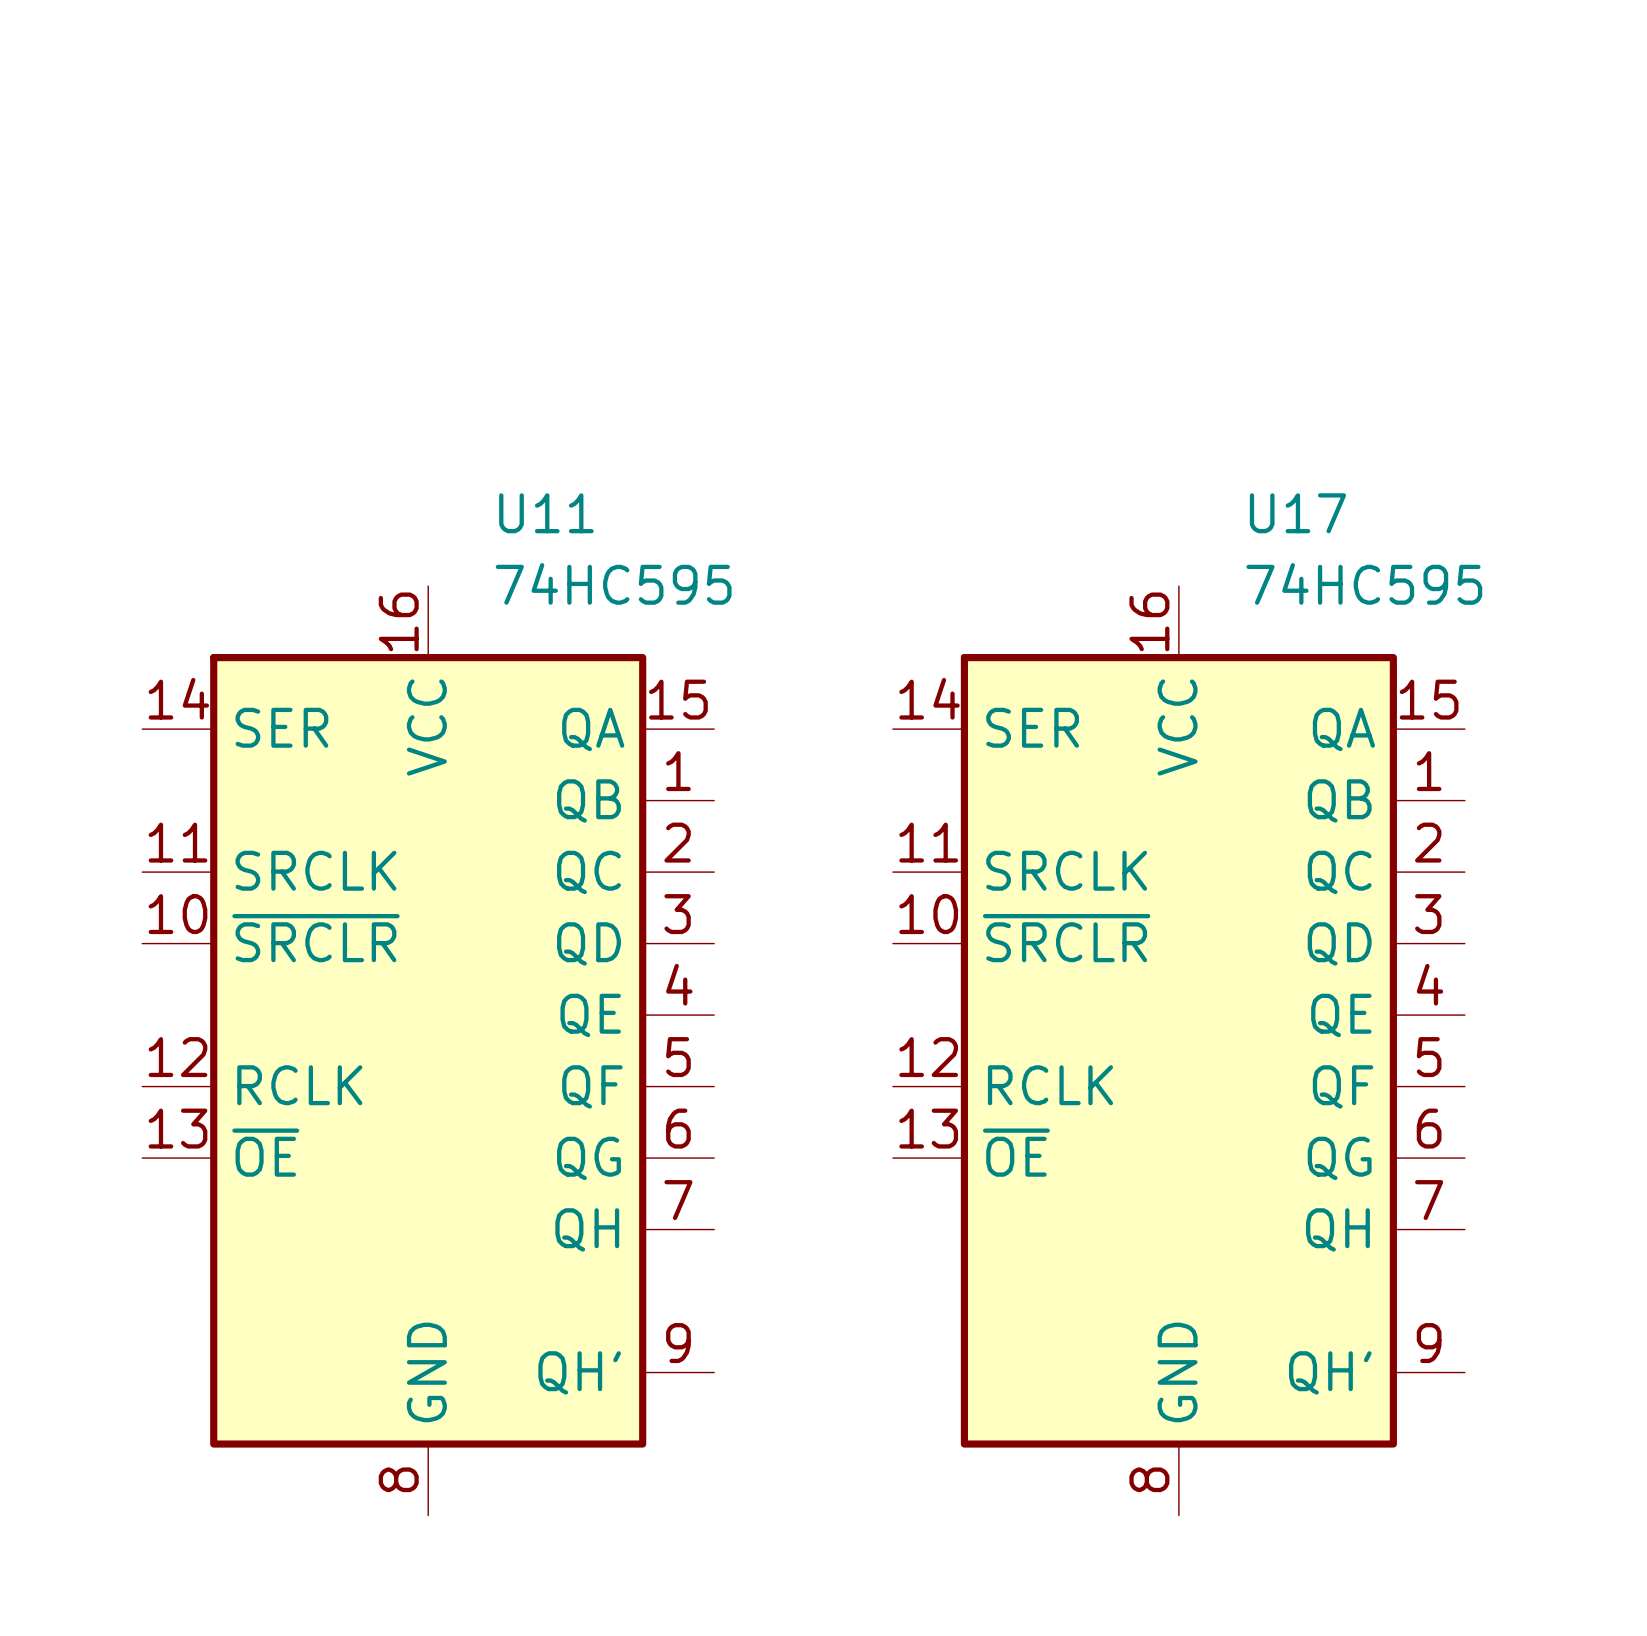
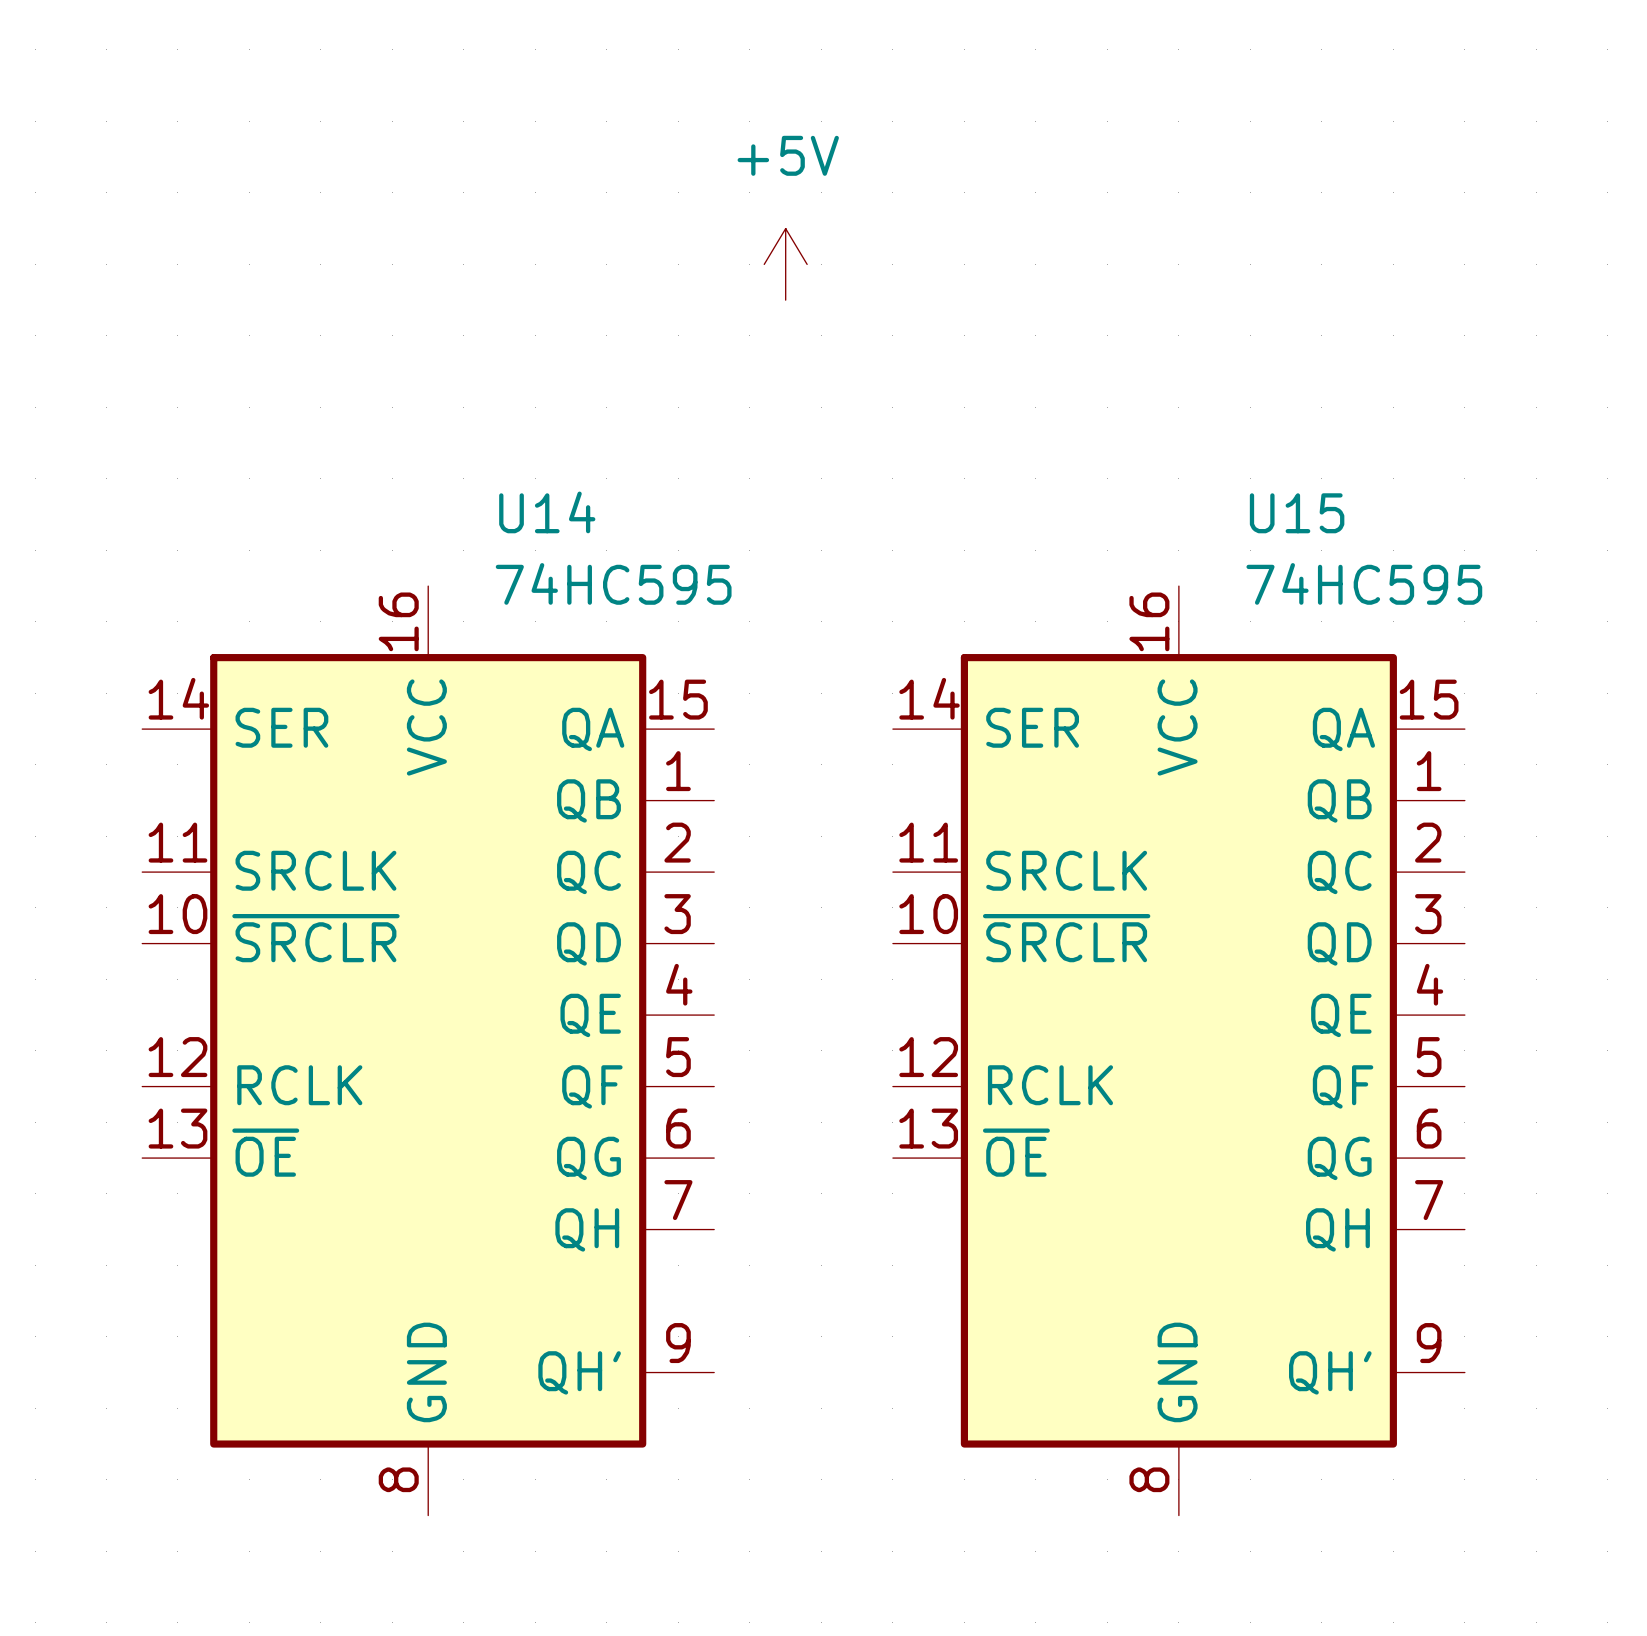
power symbol: none -> +5V (785, 264)
U11 name: U11 (546, 513) -> U14 (547, 512)
U17 name: U17 (1297, 513) -> U15 (1297, 513)

